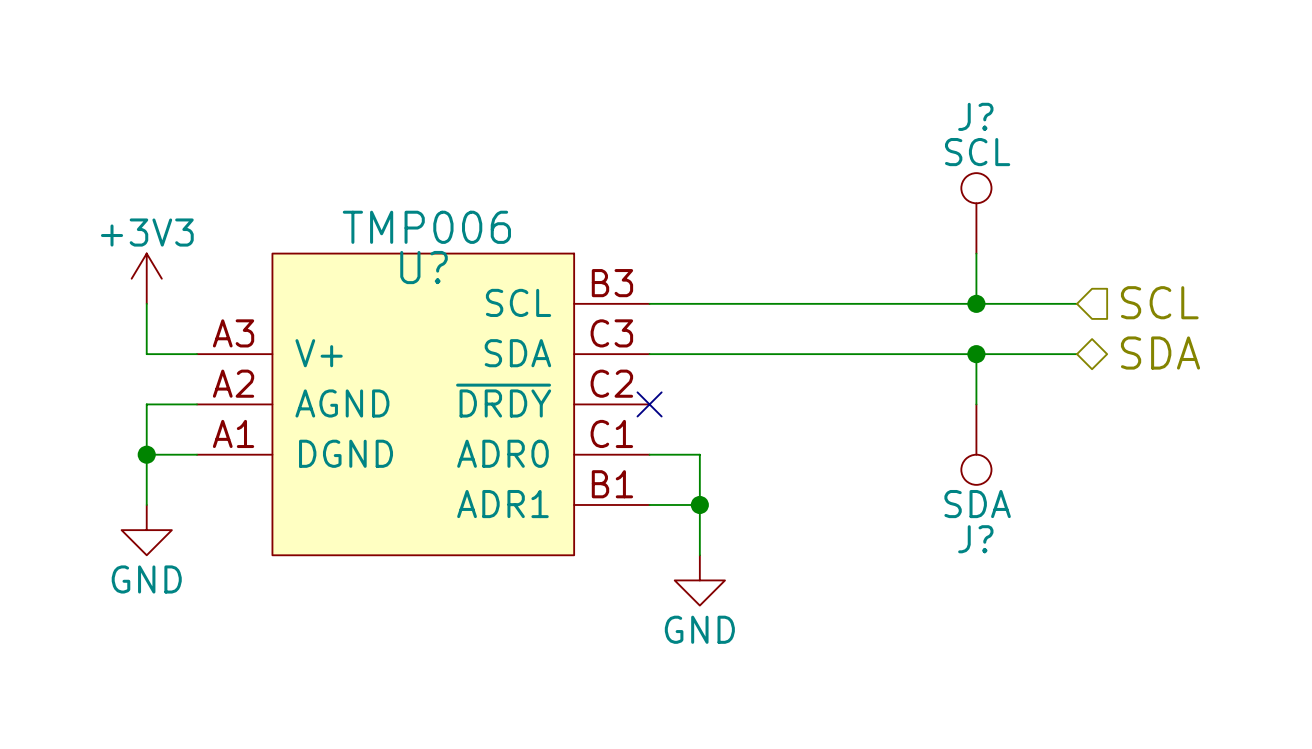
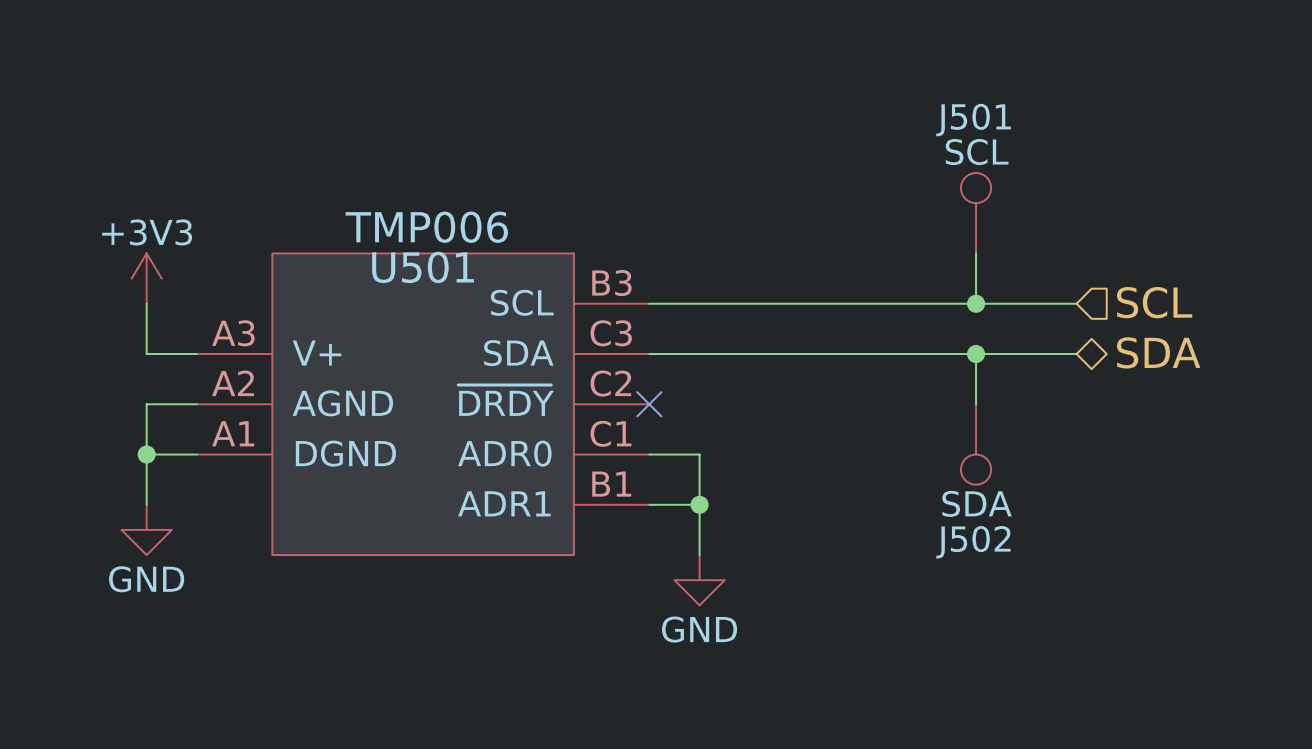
J? name: J? (975, 116) -> J501 (973, 120)
U? name: U? (424, 267) -> U501 (423, 267)
J? name: J? (975, 539) -> J502 (973, 542)

